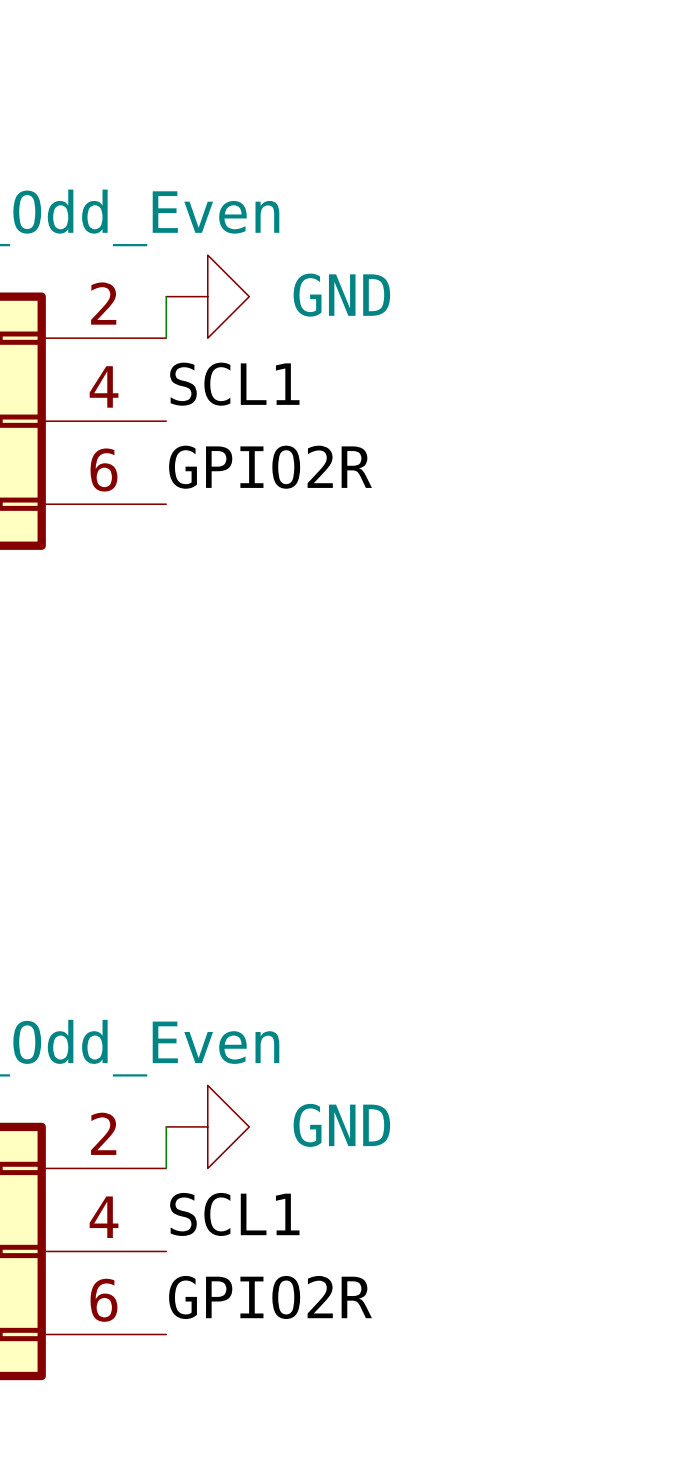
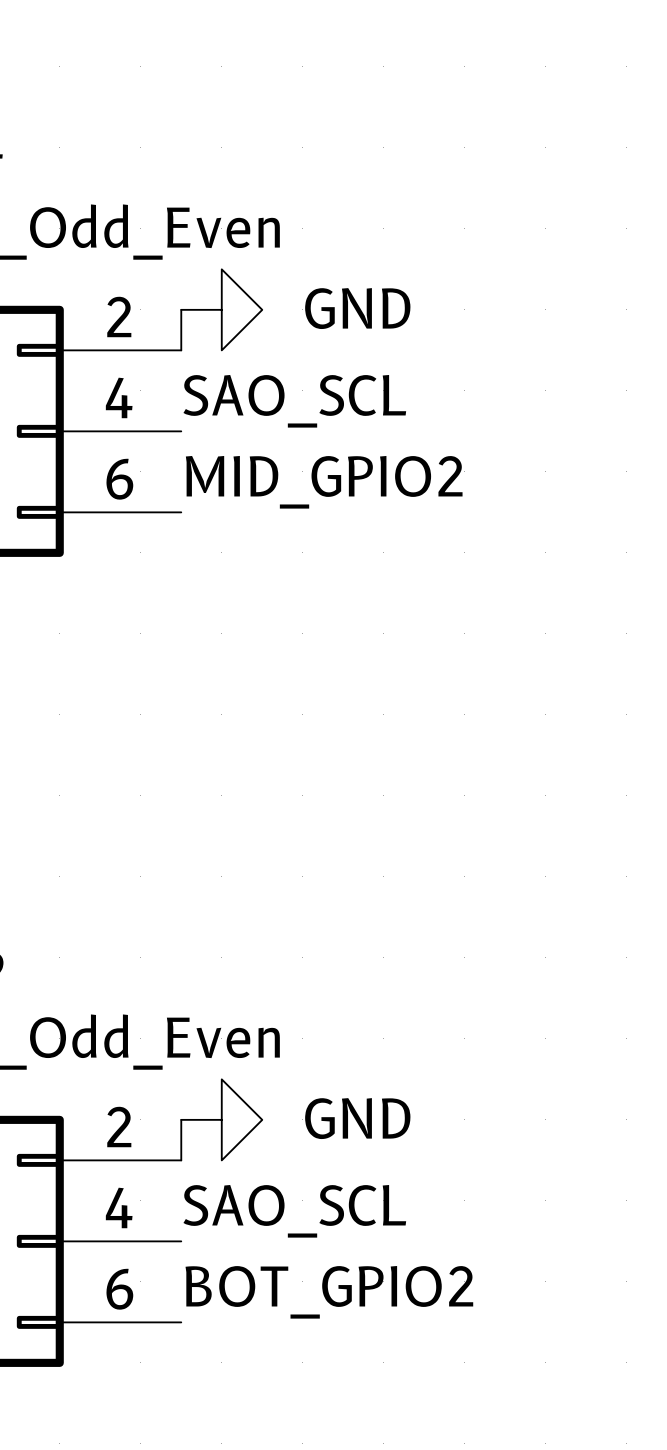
label: SCL1 (234, 384) -> SAO_SCL (294, 401)
label: GPIO2R (270, 467) -> MID_GPIO2 (324, 482)
label: SCL1 (234, 1214) -> SAO_SCL (294, 1211)
label: GPIO2R (270, 1297) -> BOT_GPIO2 (329, 1292)

